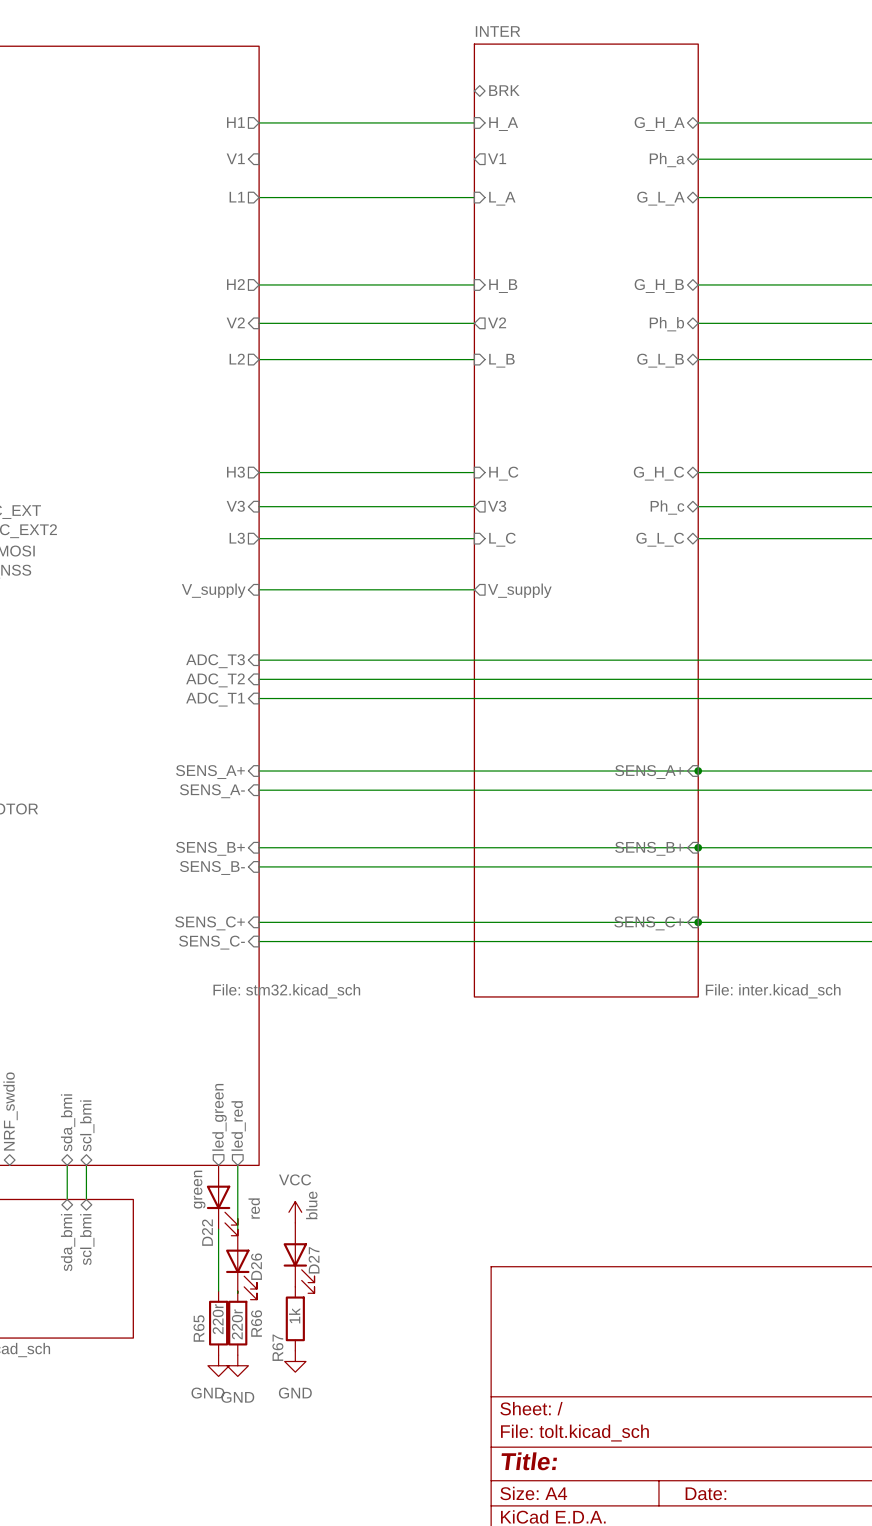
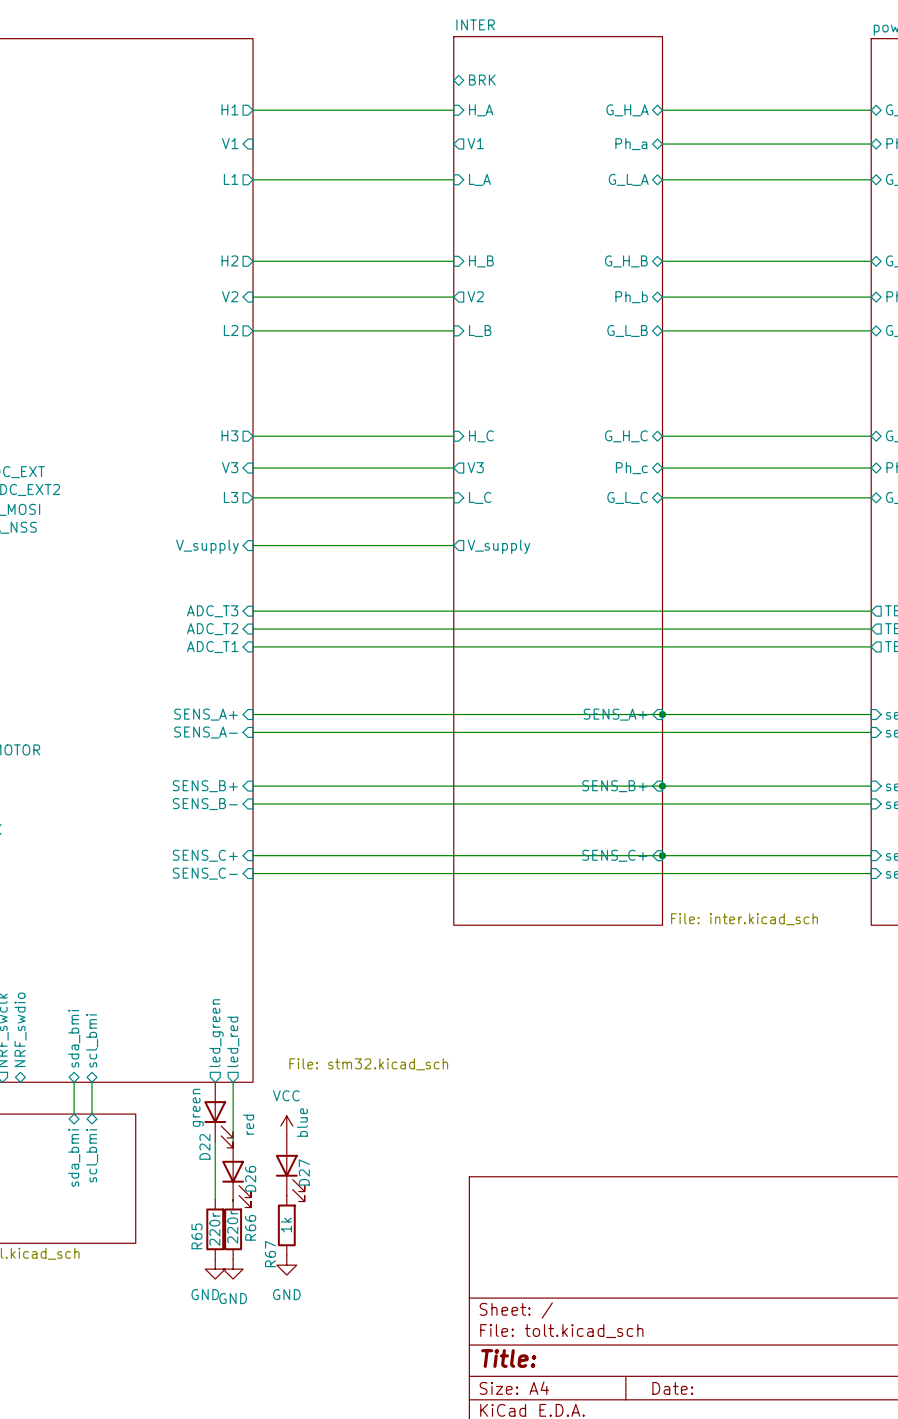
sheet value position: File: stm32.kicad_sch (286, 991) -> File: stm32.kicad_sch (368, 1064)

